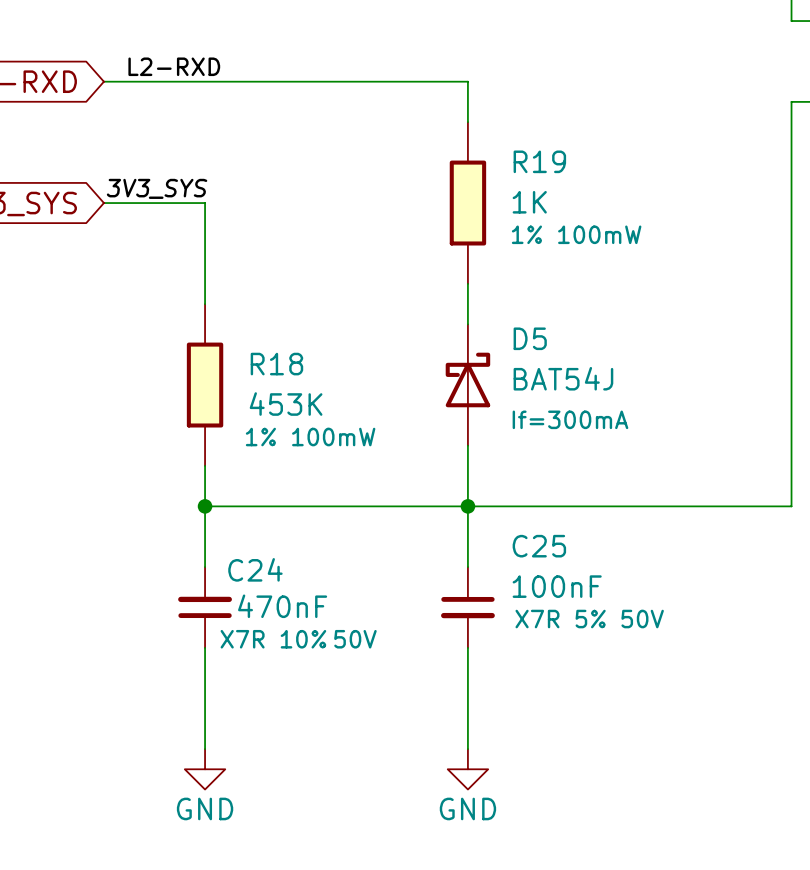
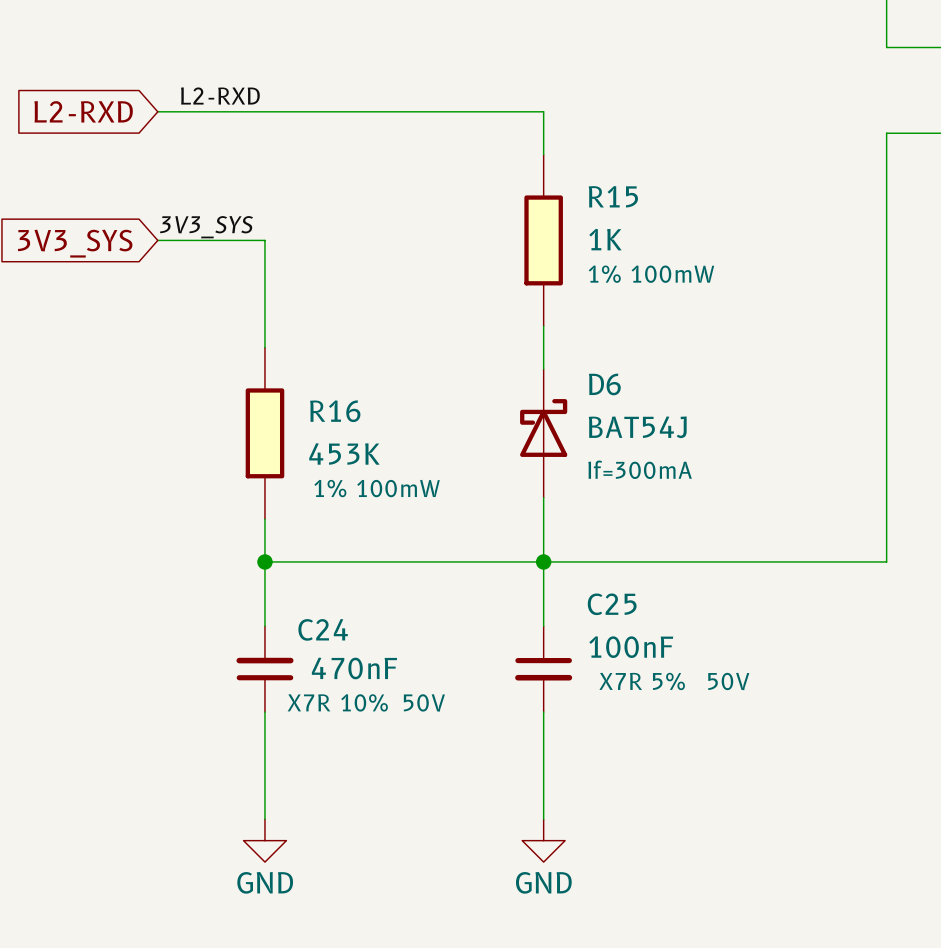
R19 name: R19 (539, 161) -> R15 (613, 196)
D5 name: D5 (530, 338) -> D6 (604, 384)
R18 name: R18 (276, 364) -> R16 (335, 411)

